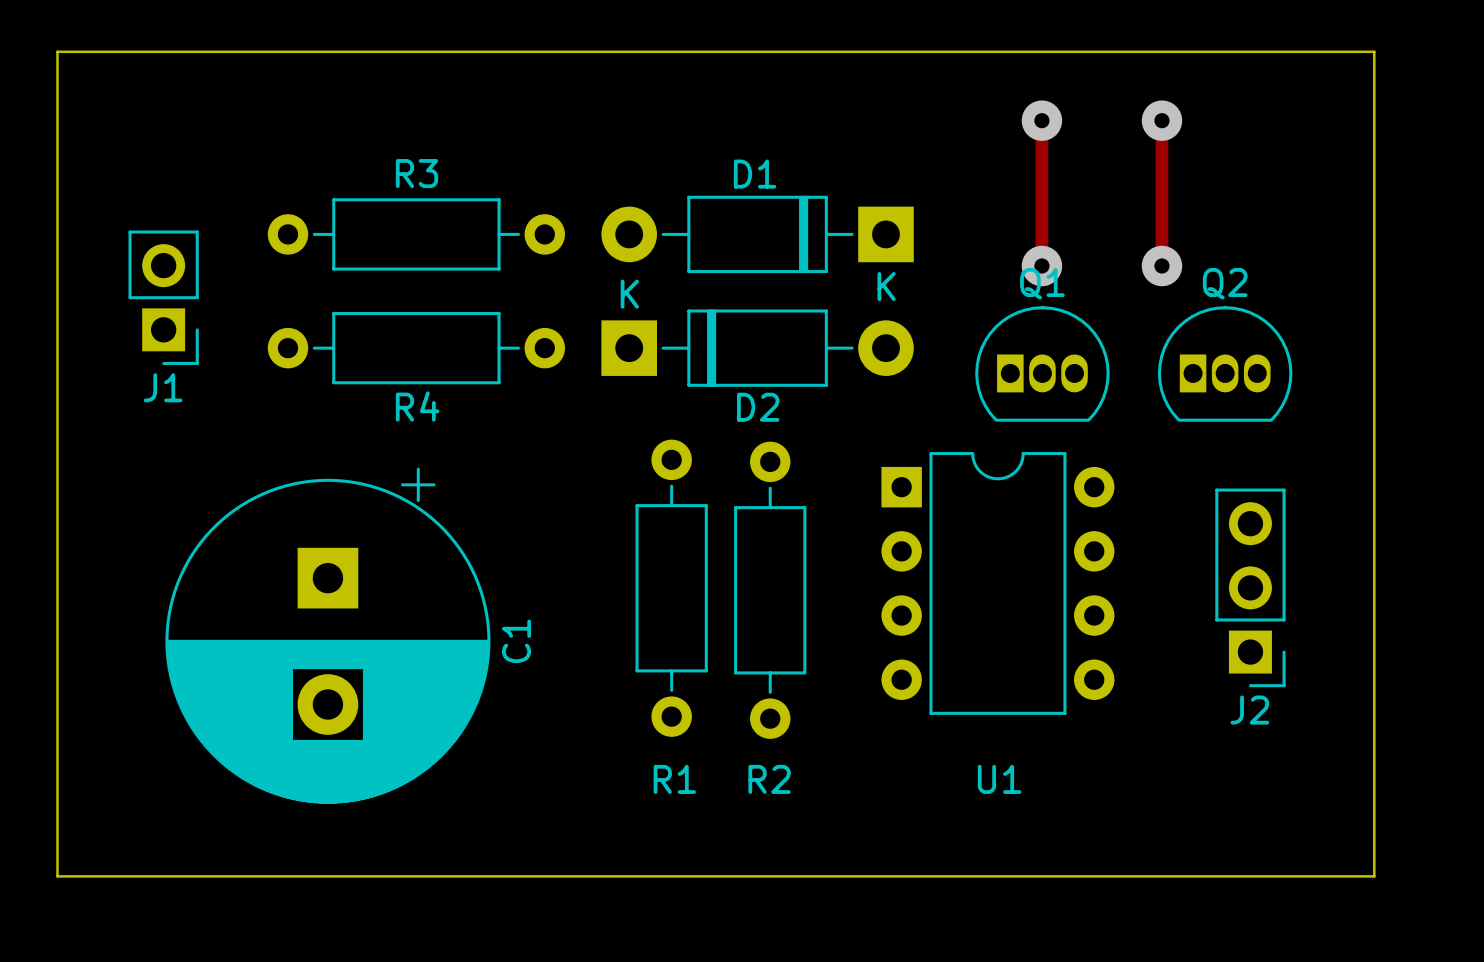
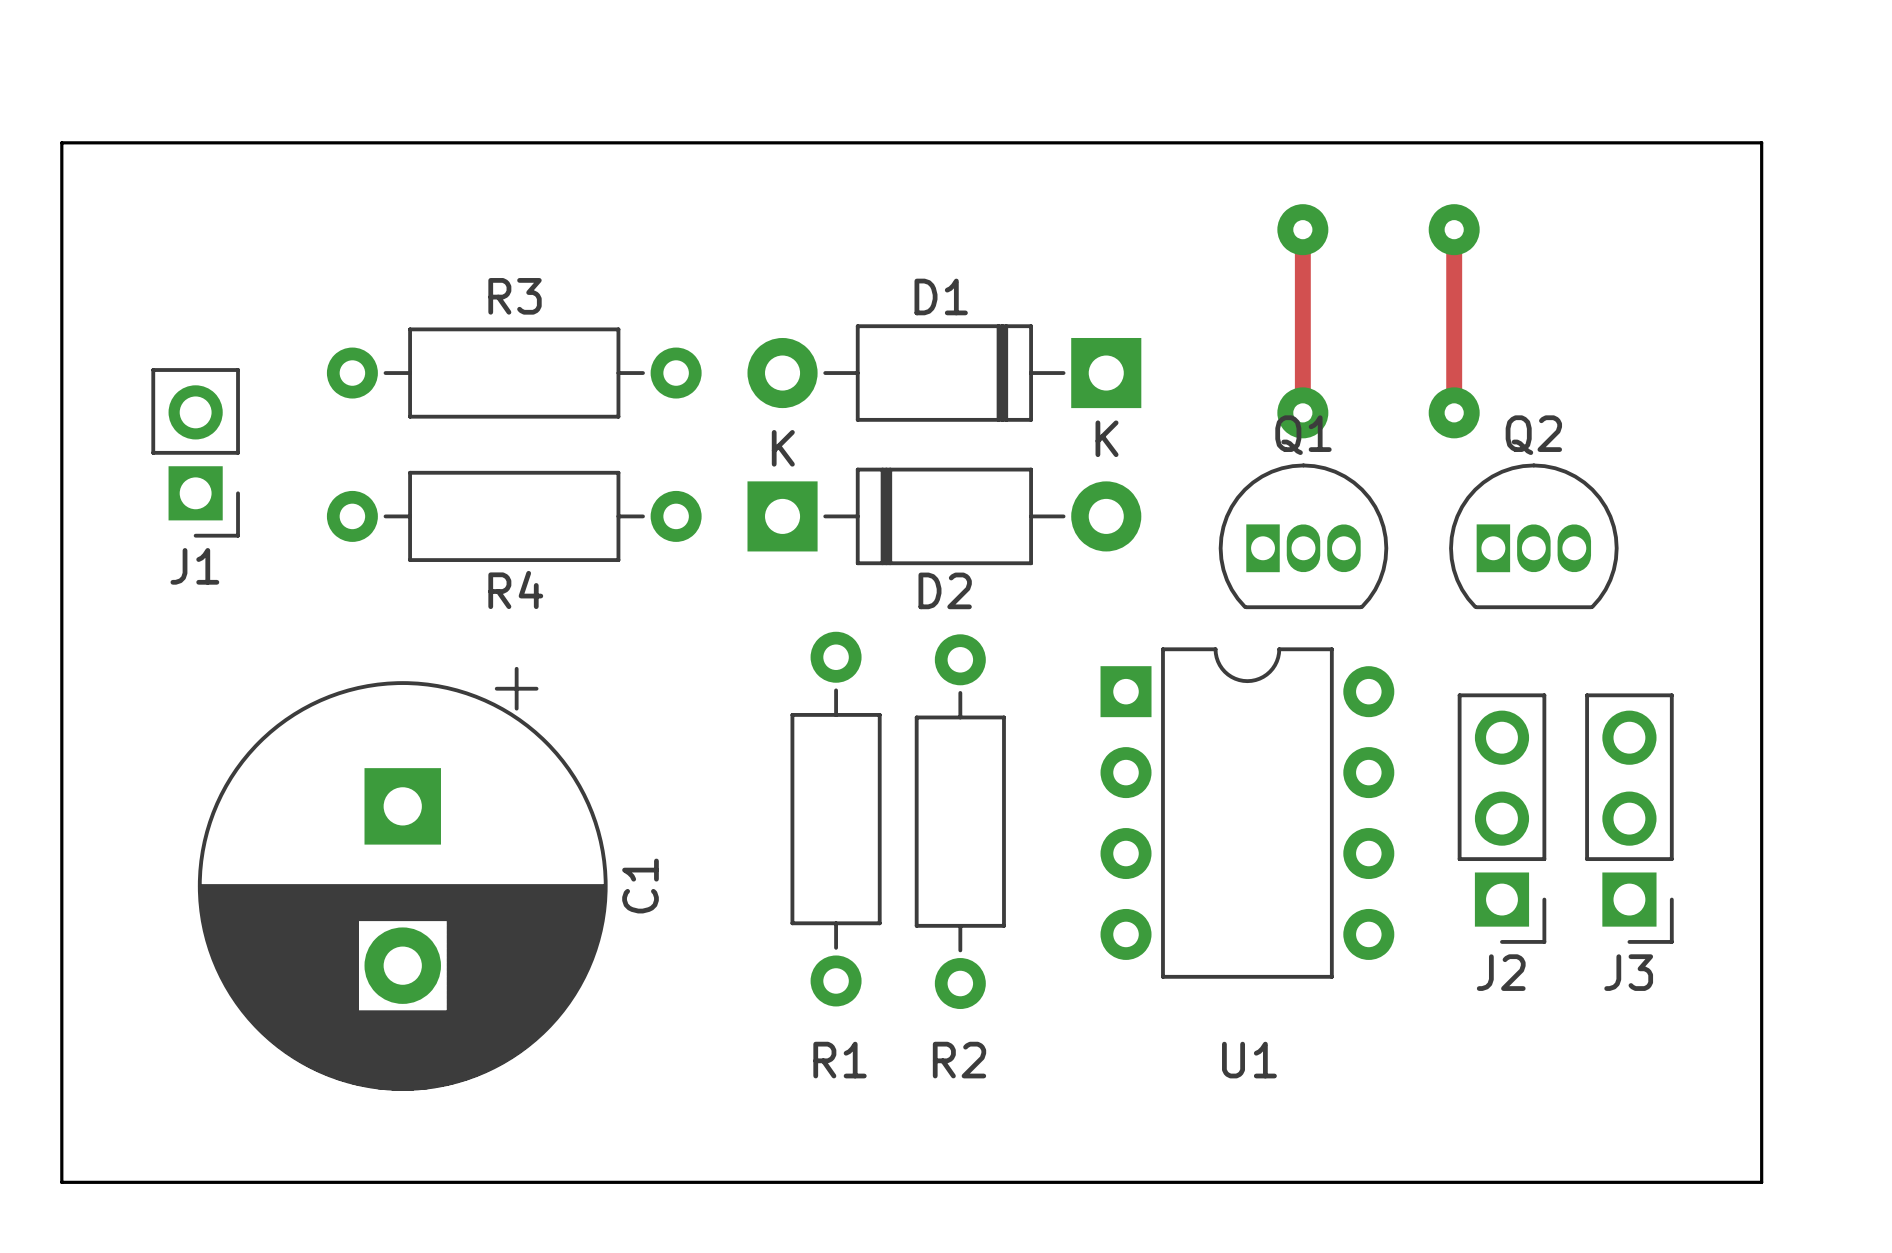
board edge: (1374, 51) (1374, 876) -> (1721, 142) (1761, 142) (1761, 1182) (1721, 1182)
J2 position: (1250, 587) -> (1501, 818)
J3: none -> (1629, 818)

